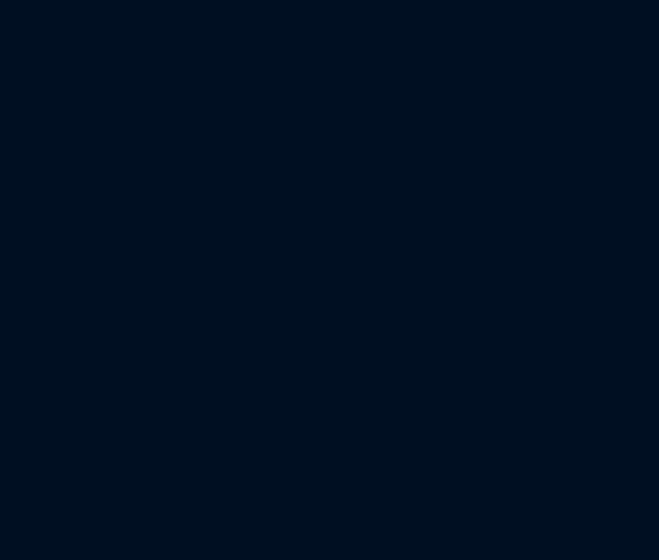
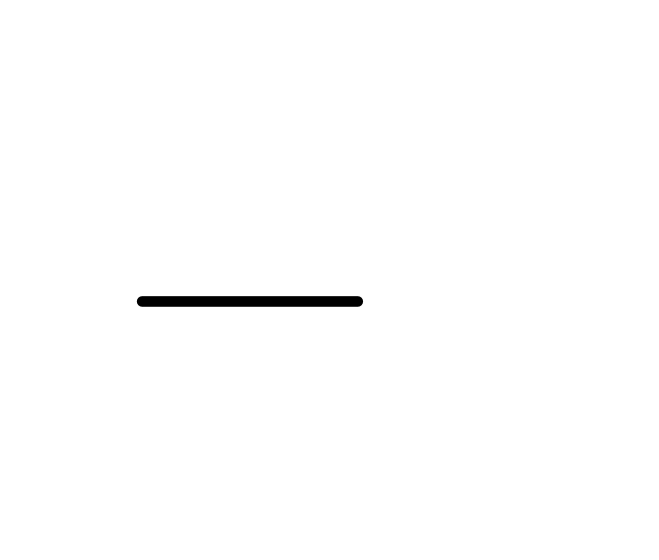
board edge: none -> (357, 301) (142, 301)

